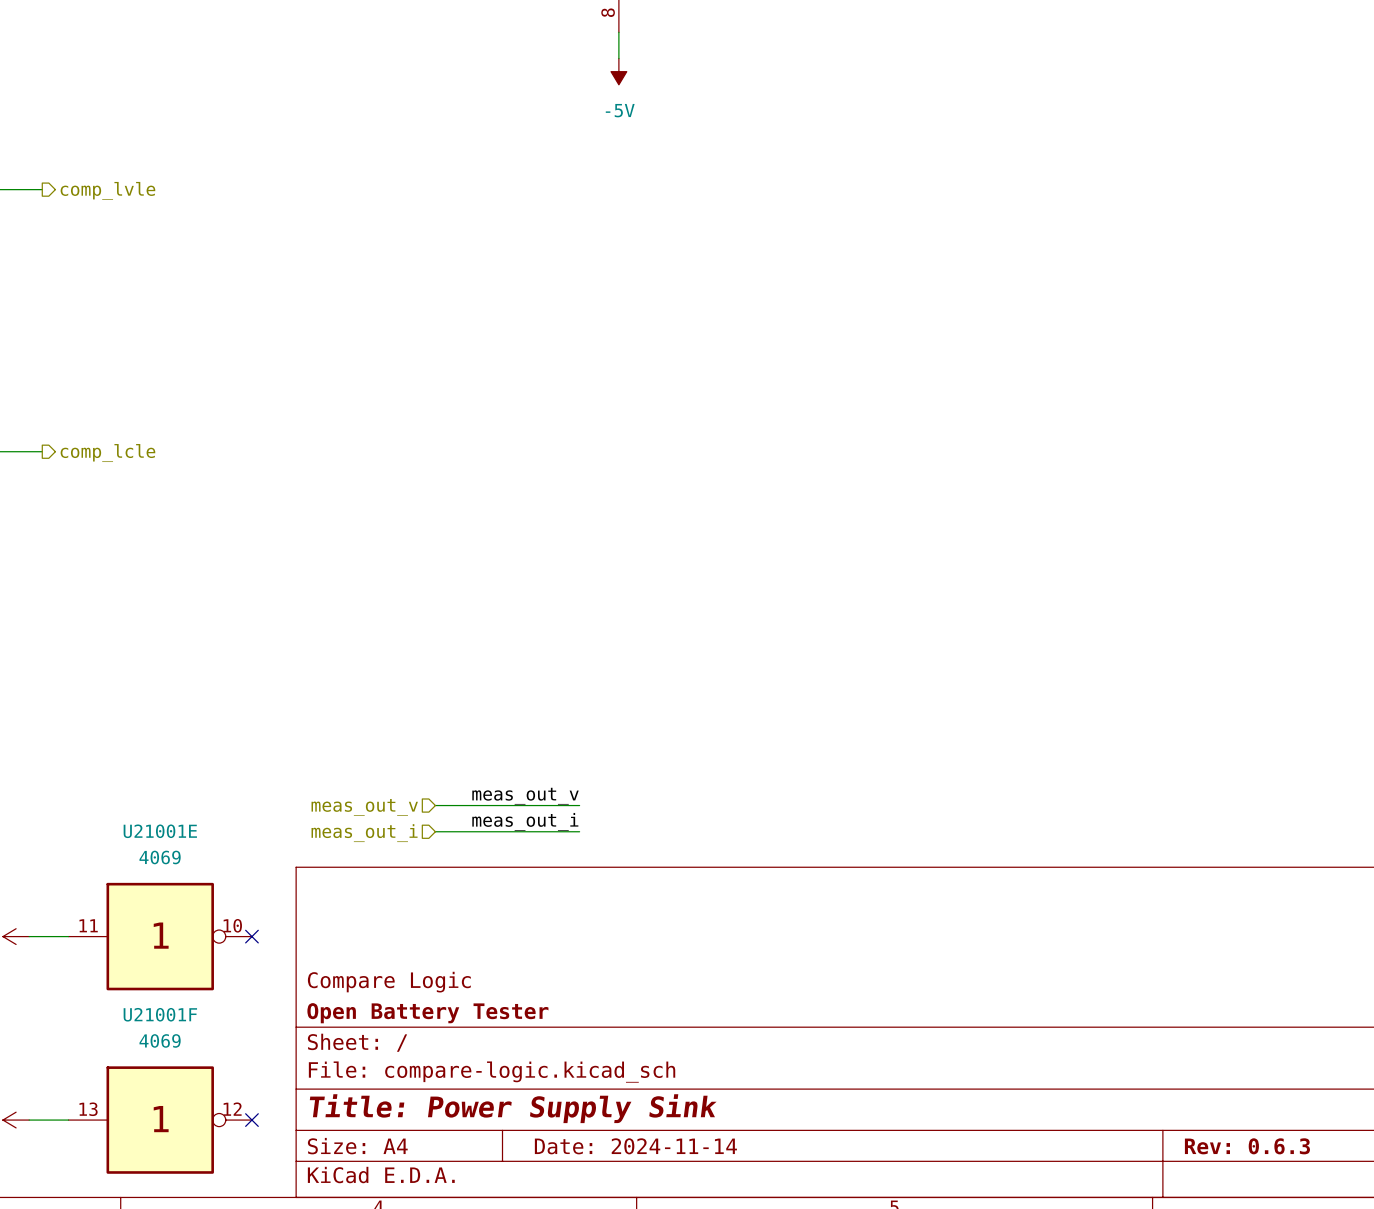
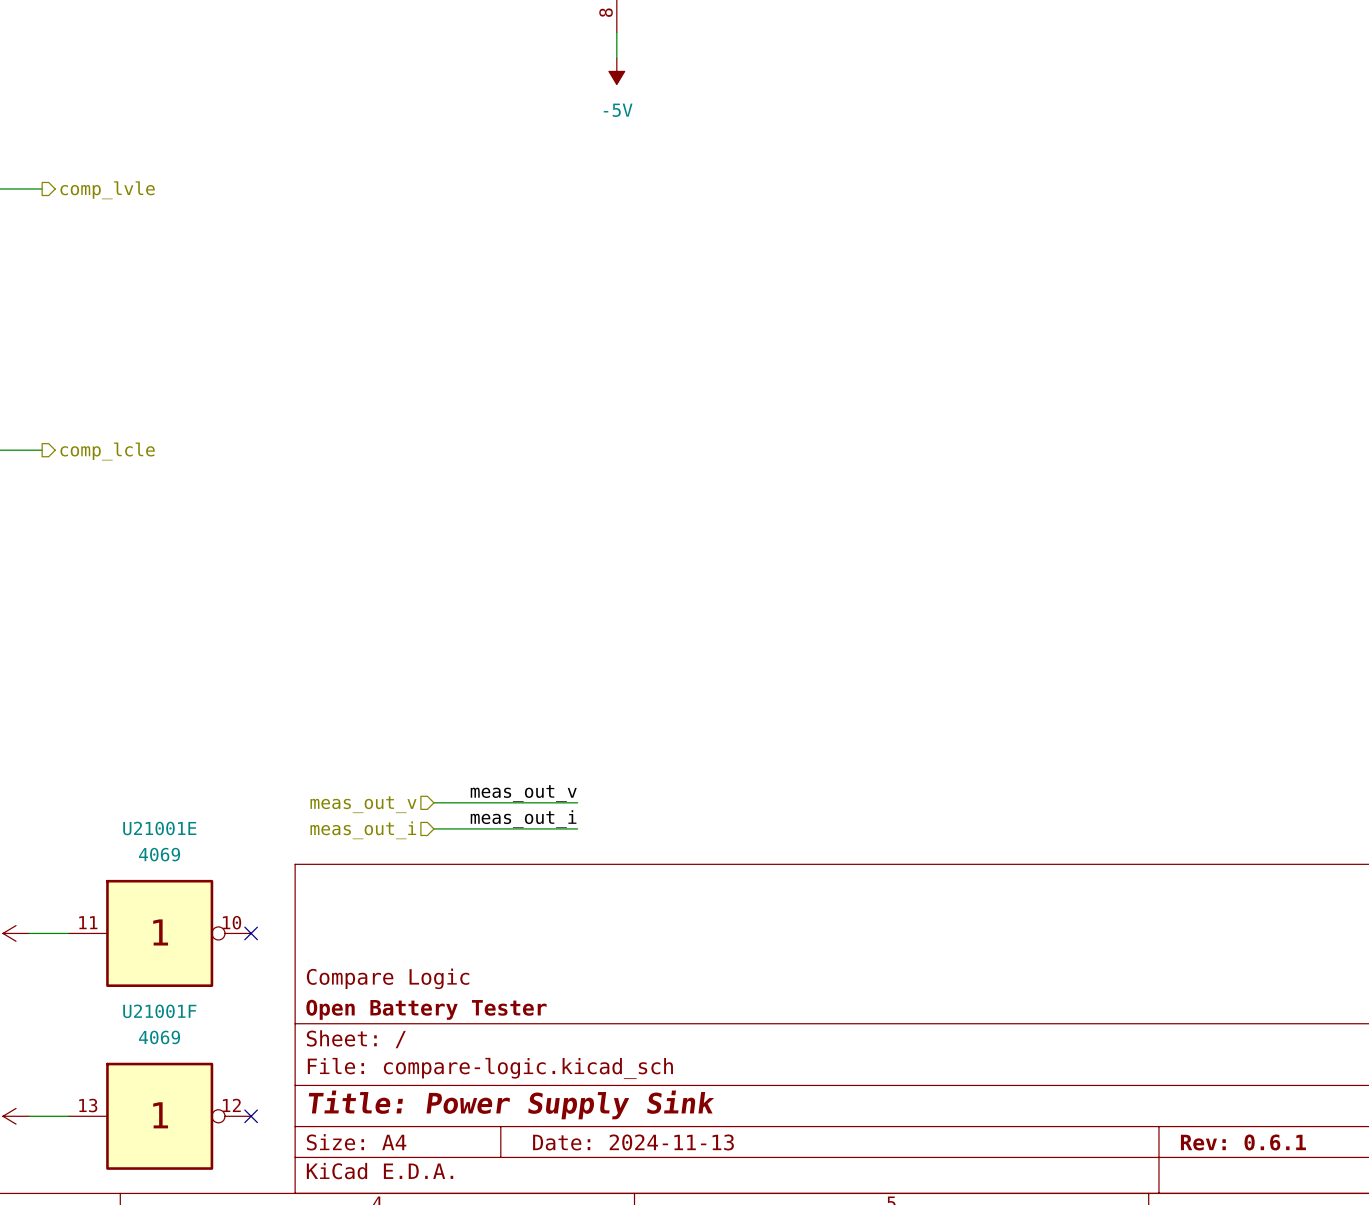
title block: Date: 2024-11-14 (635, 1146) -> Date: 2024-11-13 (633, 1142)
title block: Rev: 0.6.3 (1247, 1146) -> Rev: 0.6.1 (1243, 1142)

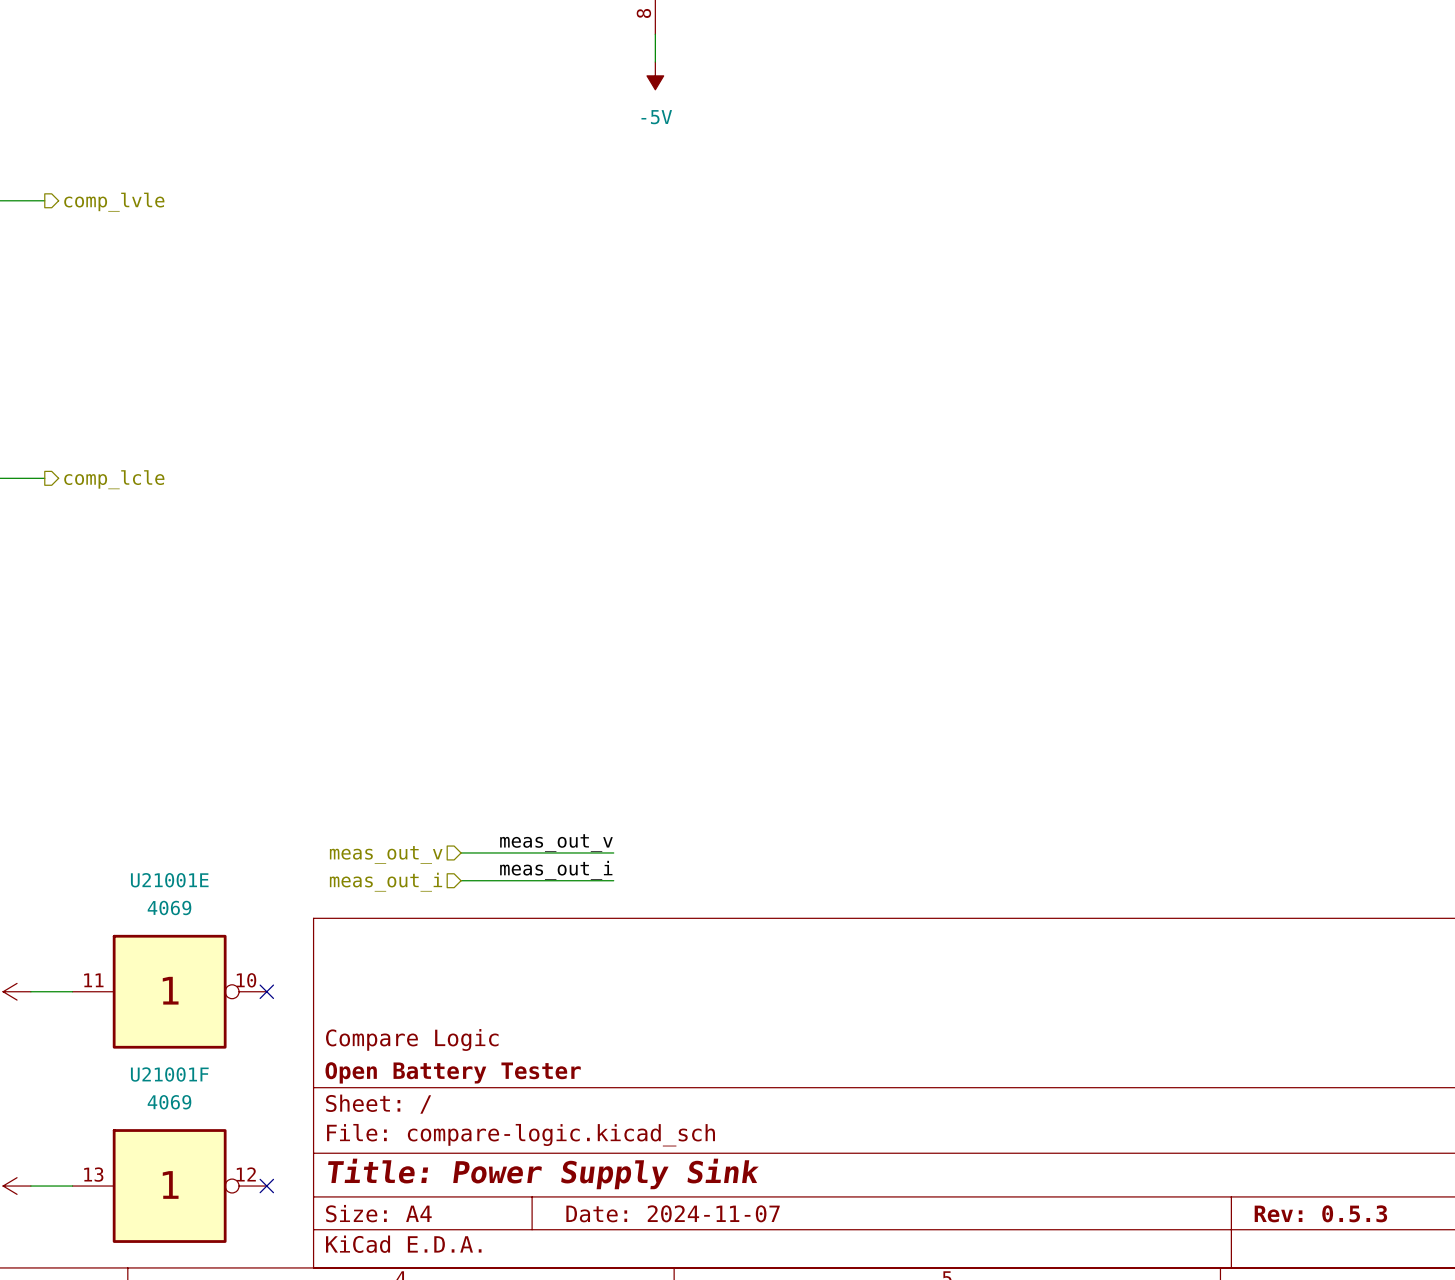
title block: Date: 2024-11-13 (633, 1142) -> Date: 2024-11-07 (673, 1213)
title block: Rev: 0.6.1 (1243, 1142) -> Rev: 0.5.3 (1320, 1213)

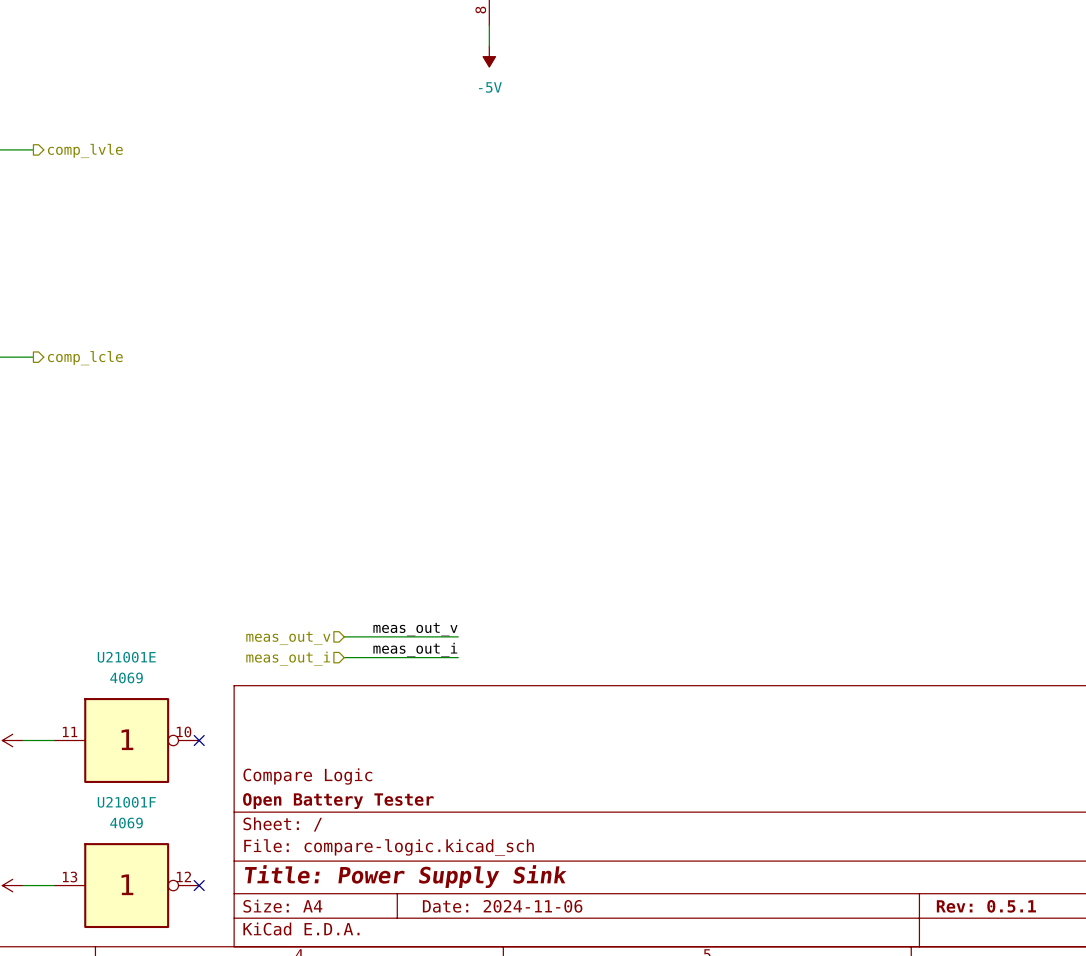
title block: Date: 2024-11-07 (673, 1213) -> Date: 2024-11-06 (502, 906)
title block: Rev: 0.5.3 (1320, 1213) -> Rev: 0.5.1 (986, 906)

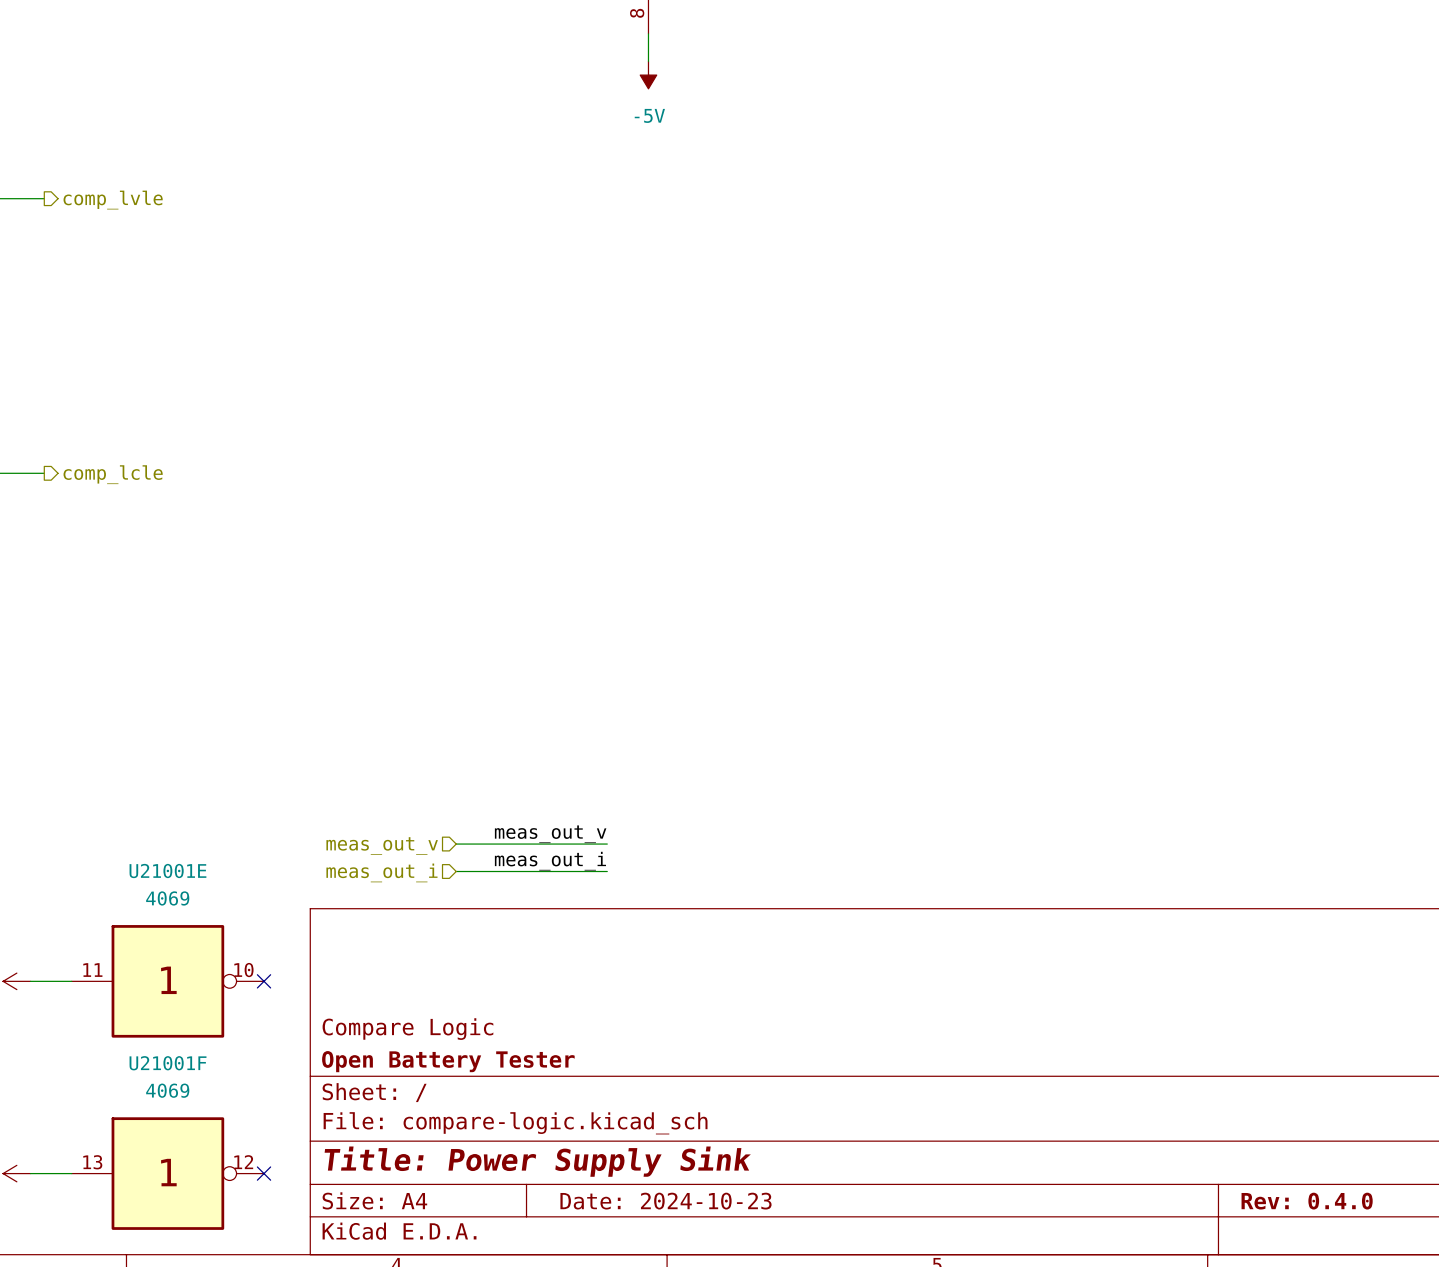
title block: Date: 2024-11-06 (502, 906) -> Date: 2024-10-23 (666, 1201)
title block: Rev: 0.5.1 (986, 906) -> Rev: 0.4.0 (1307, 1201)

